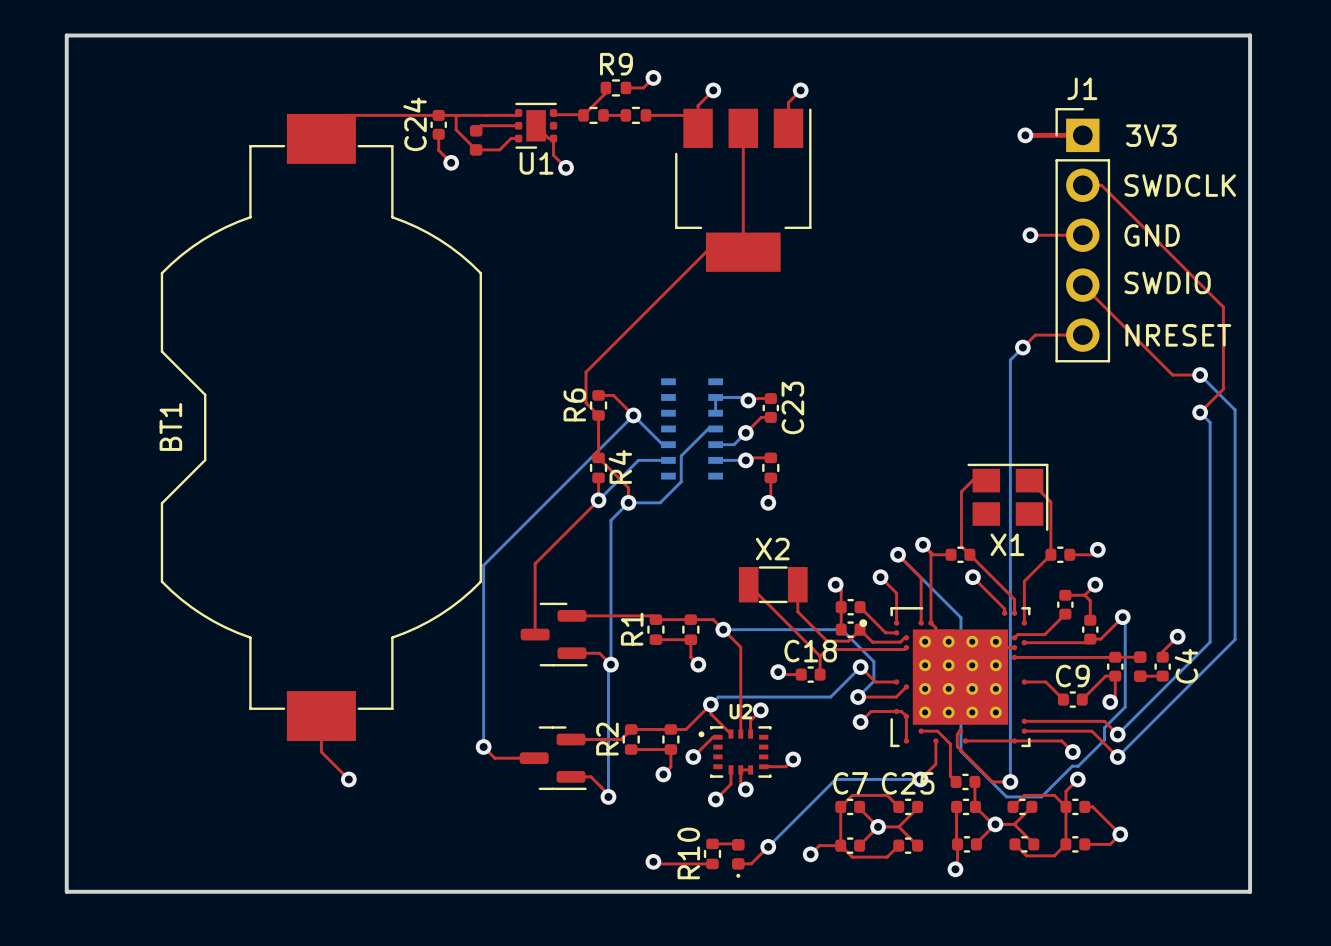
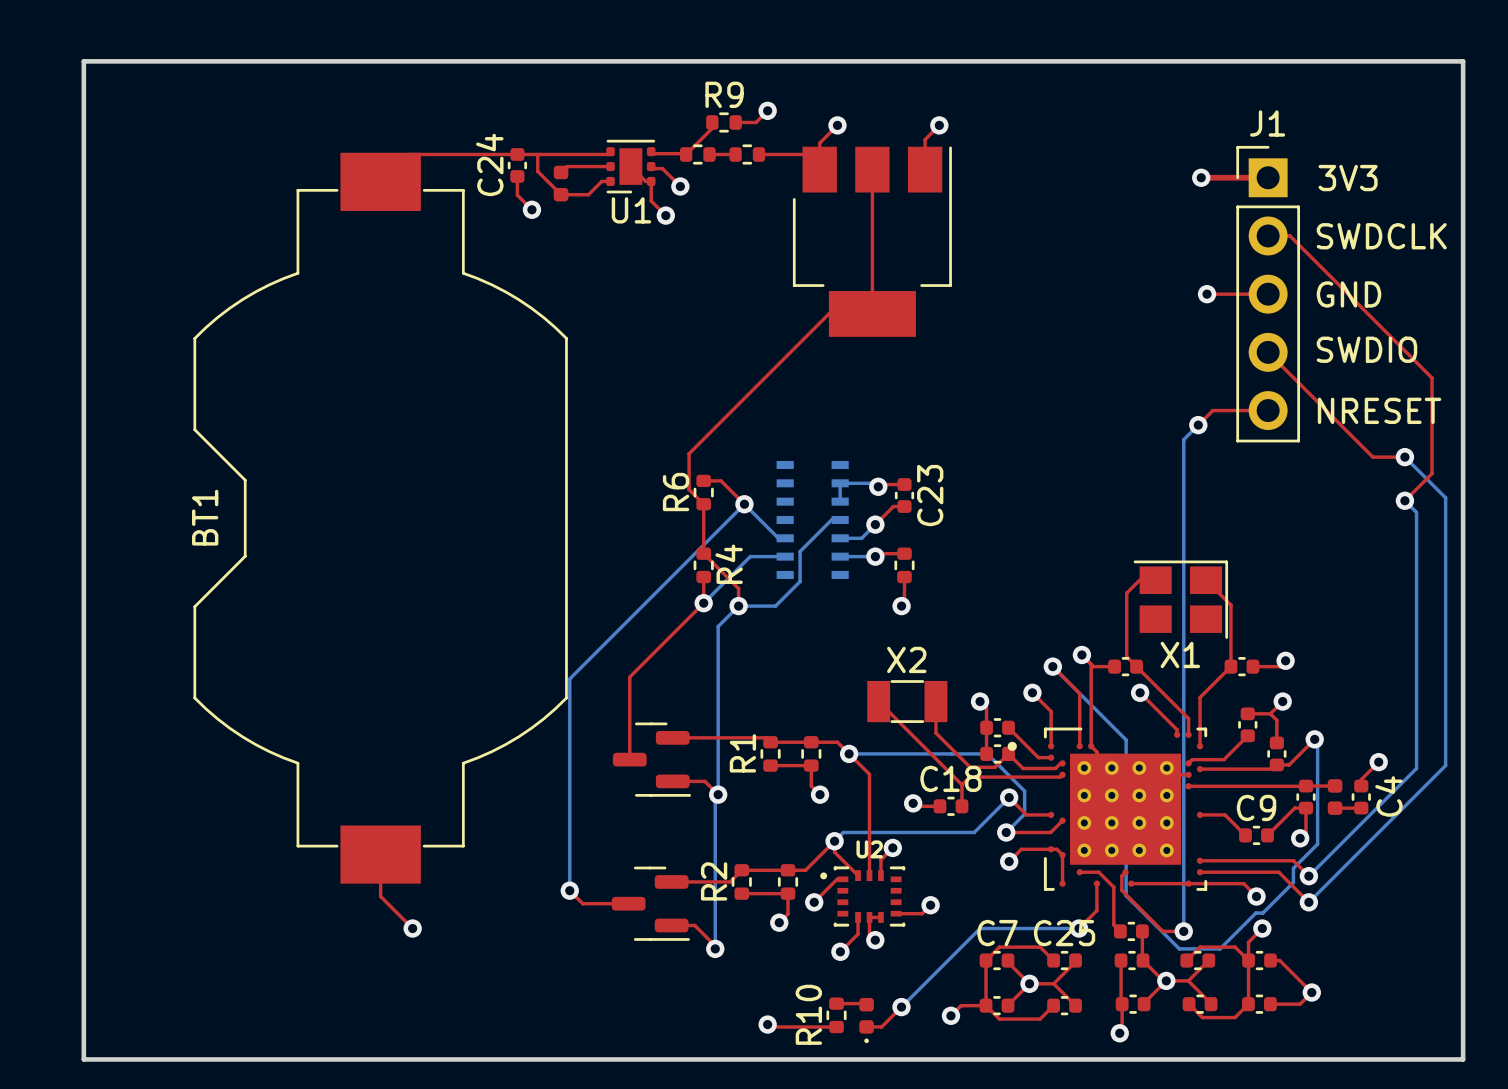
top track: none -> (651, 168) (662, 168) (680, 186)
via: none -> (680, 186)

